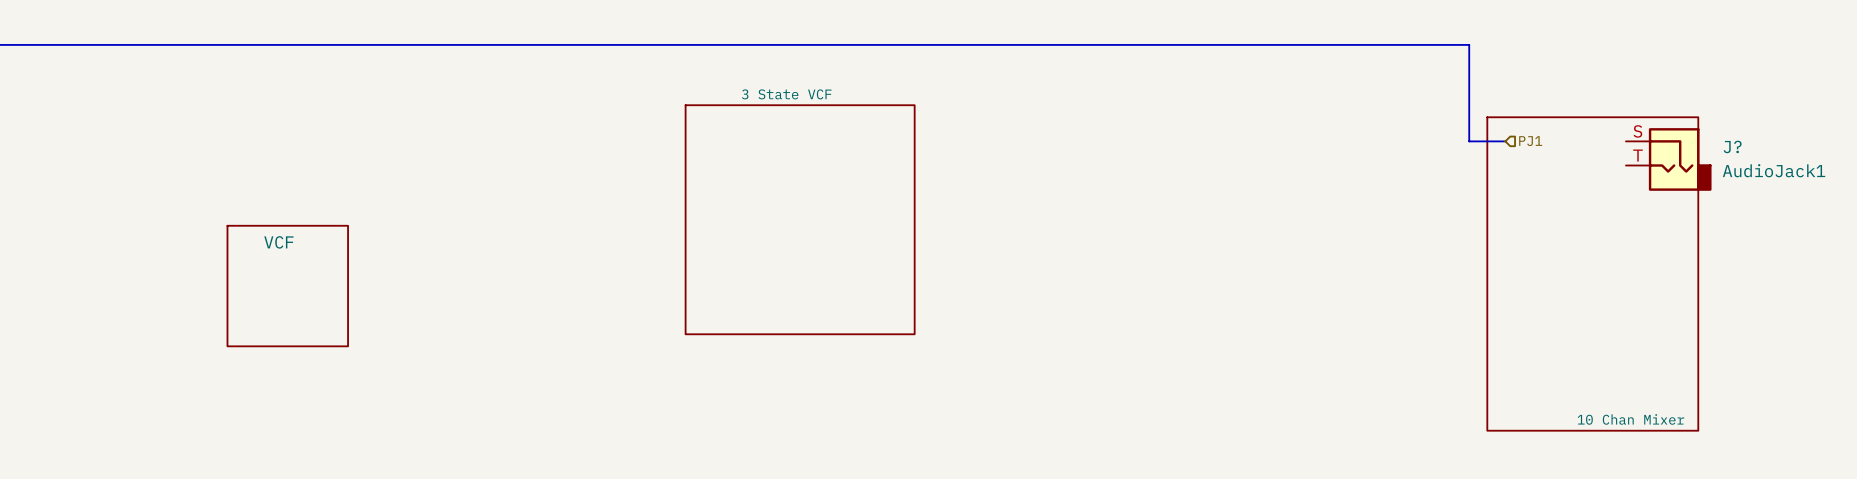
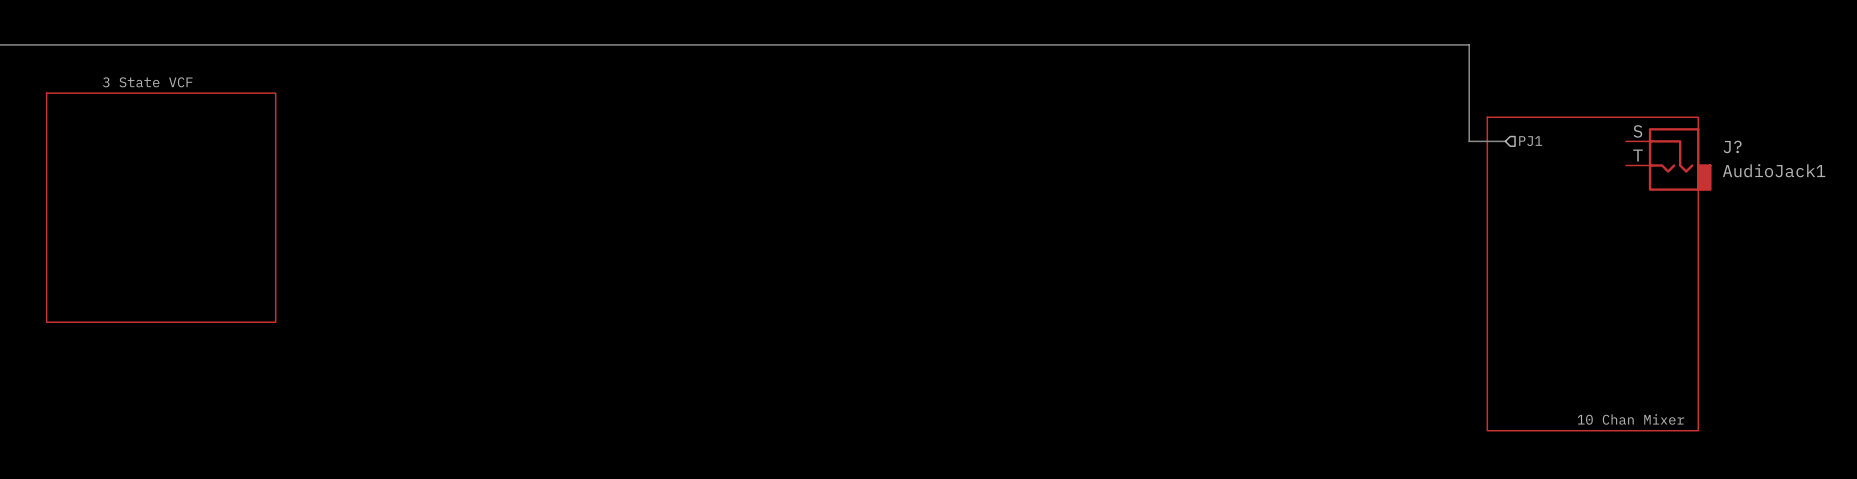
sheet 3 State VCF position: (800, 219) -> (161, 207)
sheet VCF: (287, 286) -> none

